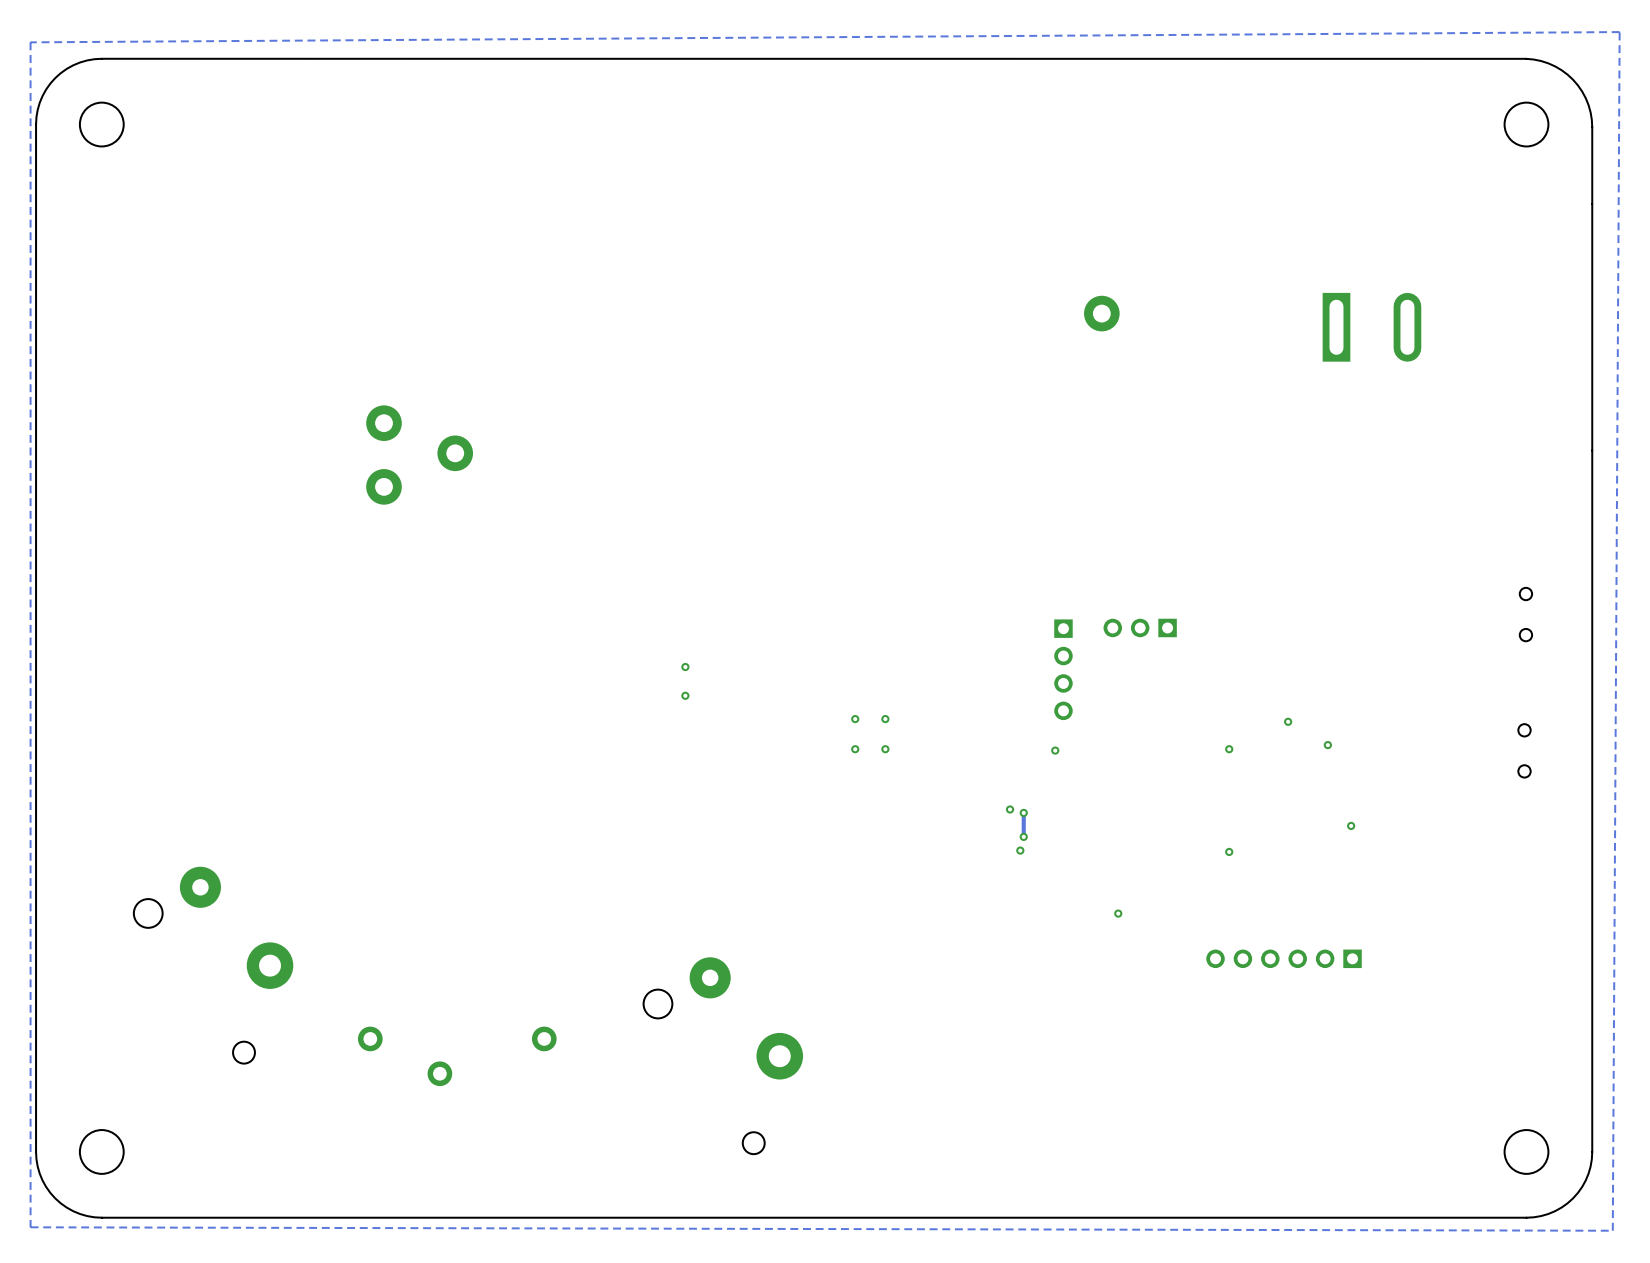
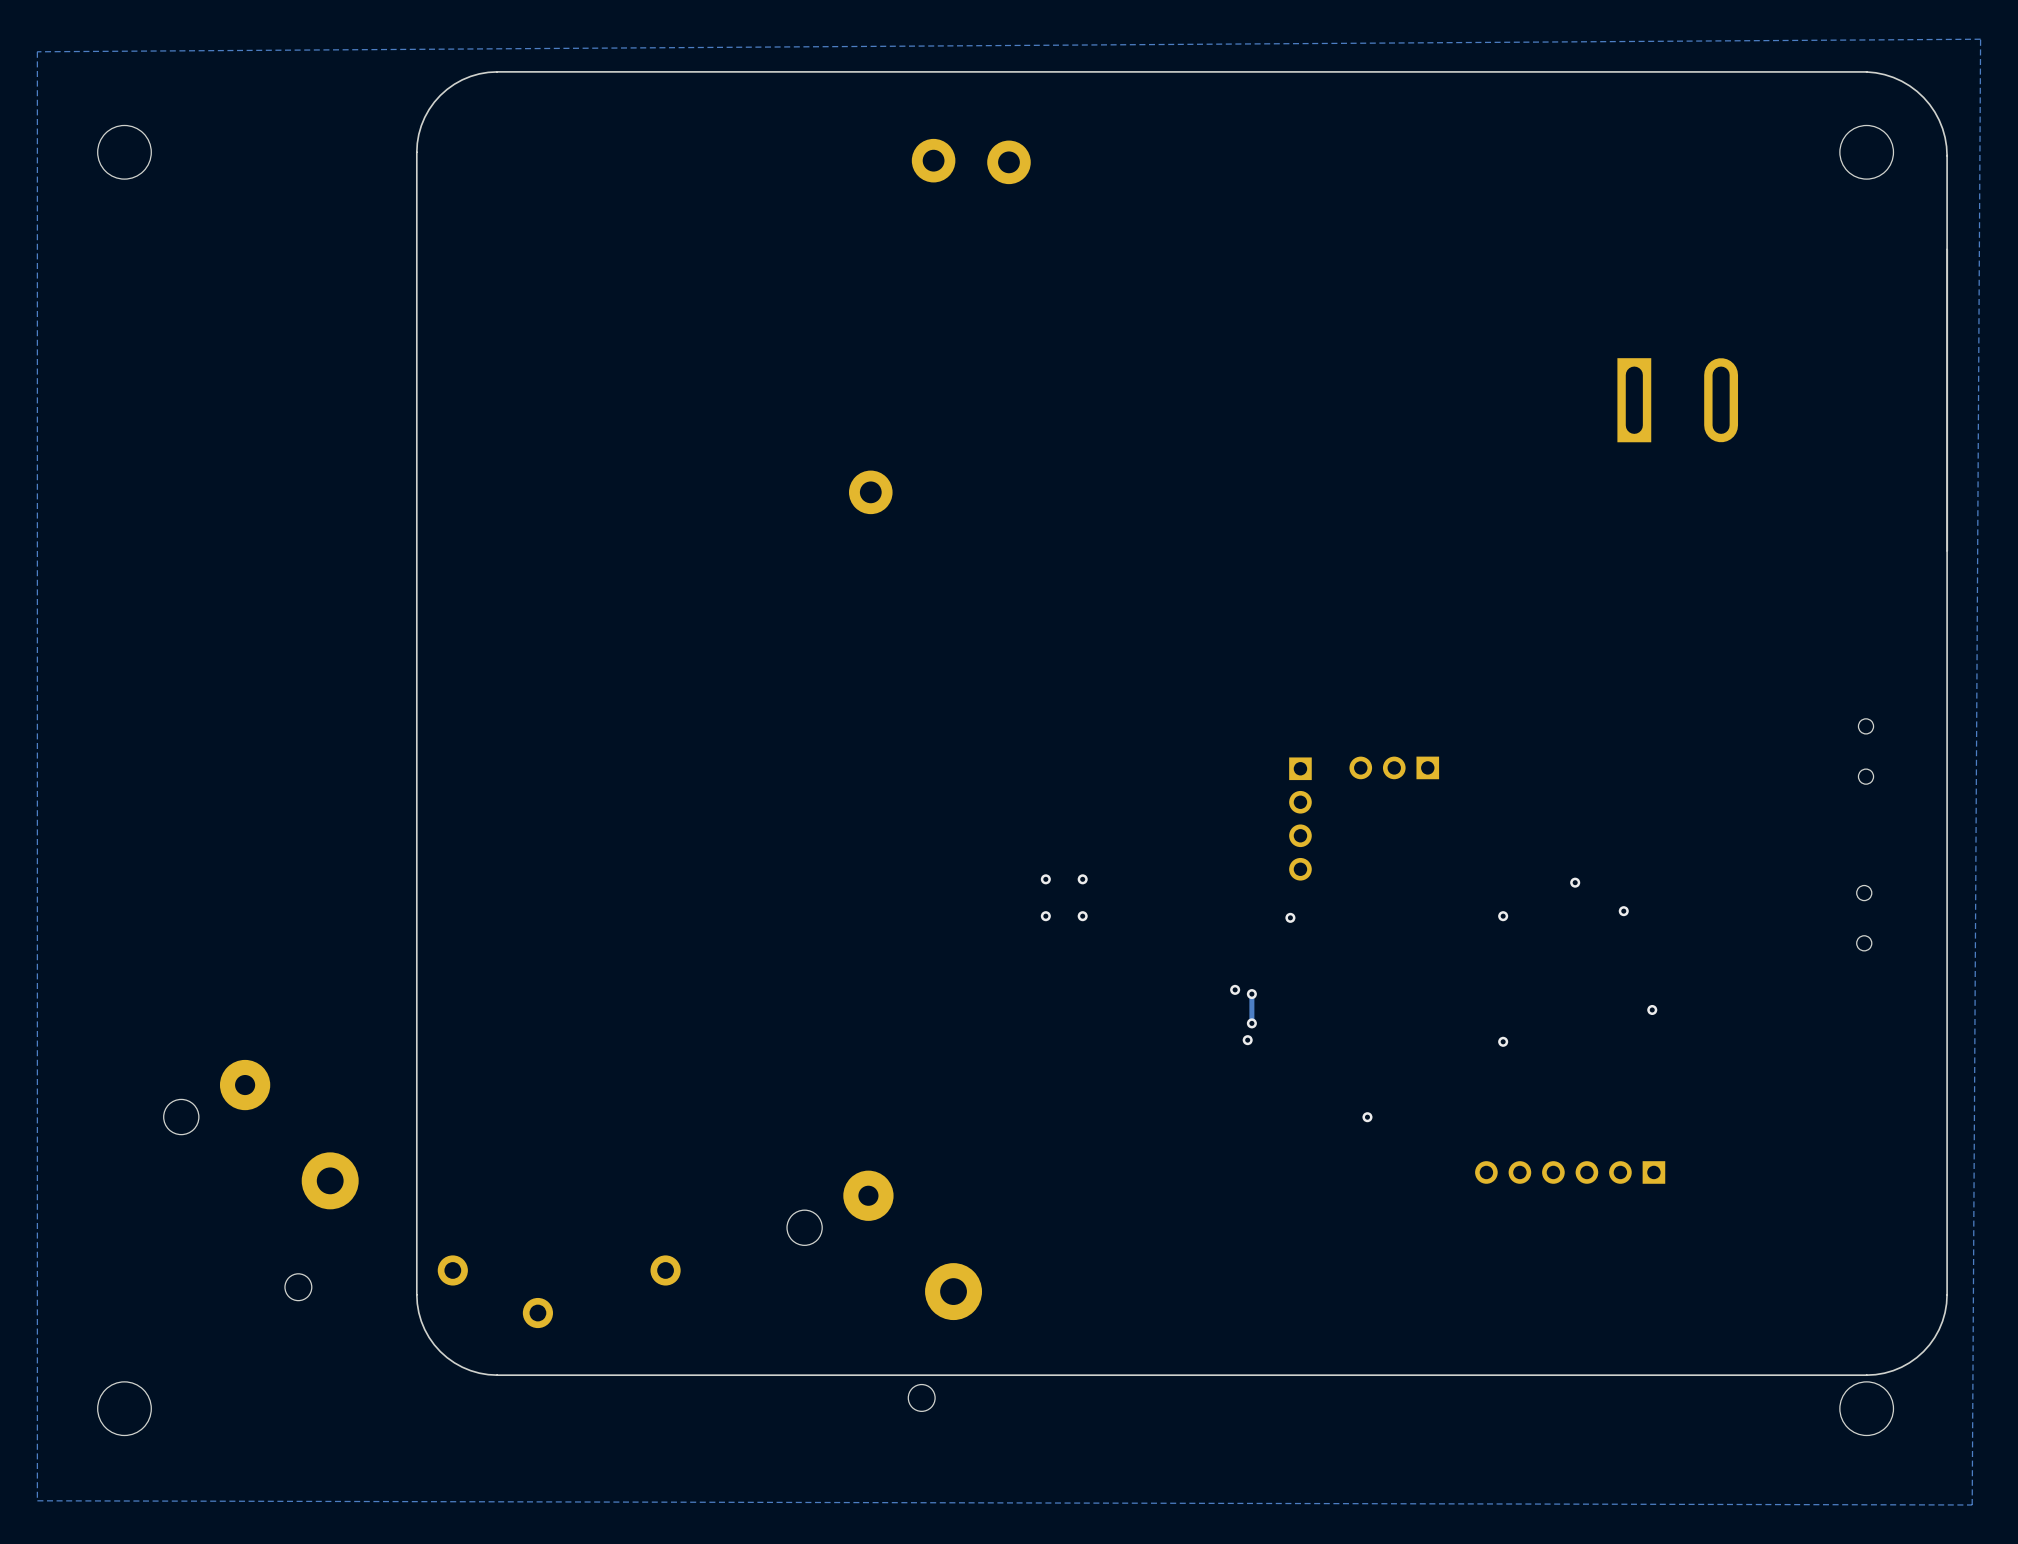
board edge: (406, 58) (94, 59) (73, 65) (60, 73) (50, 83) (39, 102) (36, 124) (36, 1151) (37, 1166) (42, 1180) (50, 1192) (60, 1203) (80, 1214) (101, 1217) (1533, 1217) (1548, 1214) (1567, 1203) (1577, 1192) (1588, 1173) (1592, 1151) (1592, 1058) -> (497, 71) (470, 76) (454, 84) (440, 95) (424, 117) (418, 134) (416, 152) (416, 1294) (418, 1312) (424, 1329) (434, 1344) (447, 1357) (470, 1370) (497, 1375) (1866, 1375) (1884, 1373) (1901, 1367) (1923, 1351) (1939, 1329) (1945, 1312) (1947, 1294)
part: none -> (933, 160)
part: none -> (1008, 162)
part: (1101, 313) -> none
part: none -> (870, 492)
part: (384, 423) -> none
part: (455, 453) -> none
part: (384, 486) -> none
via: (685, 667) -> none
via: (685, 695) -> none

